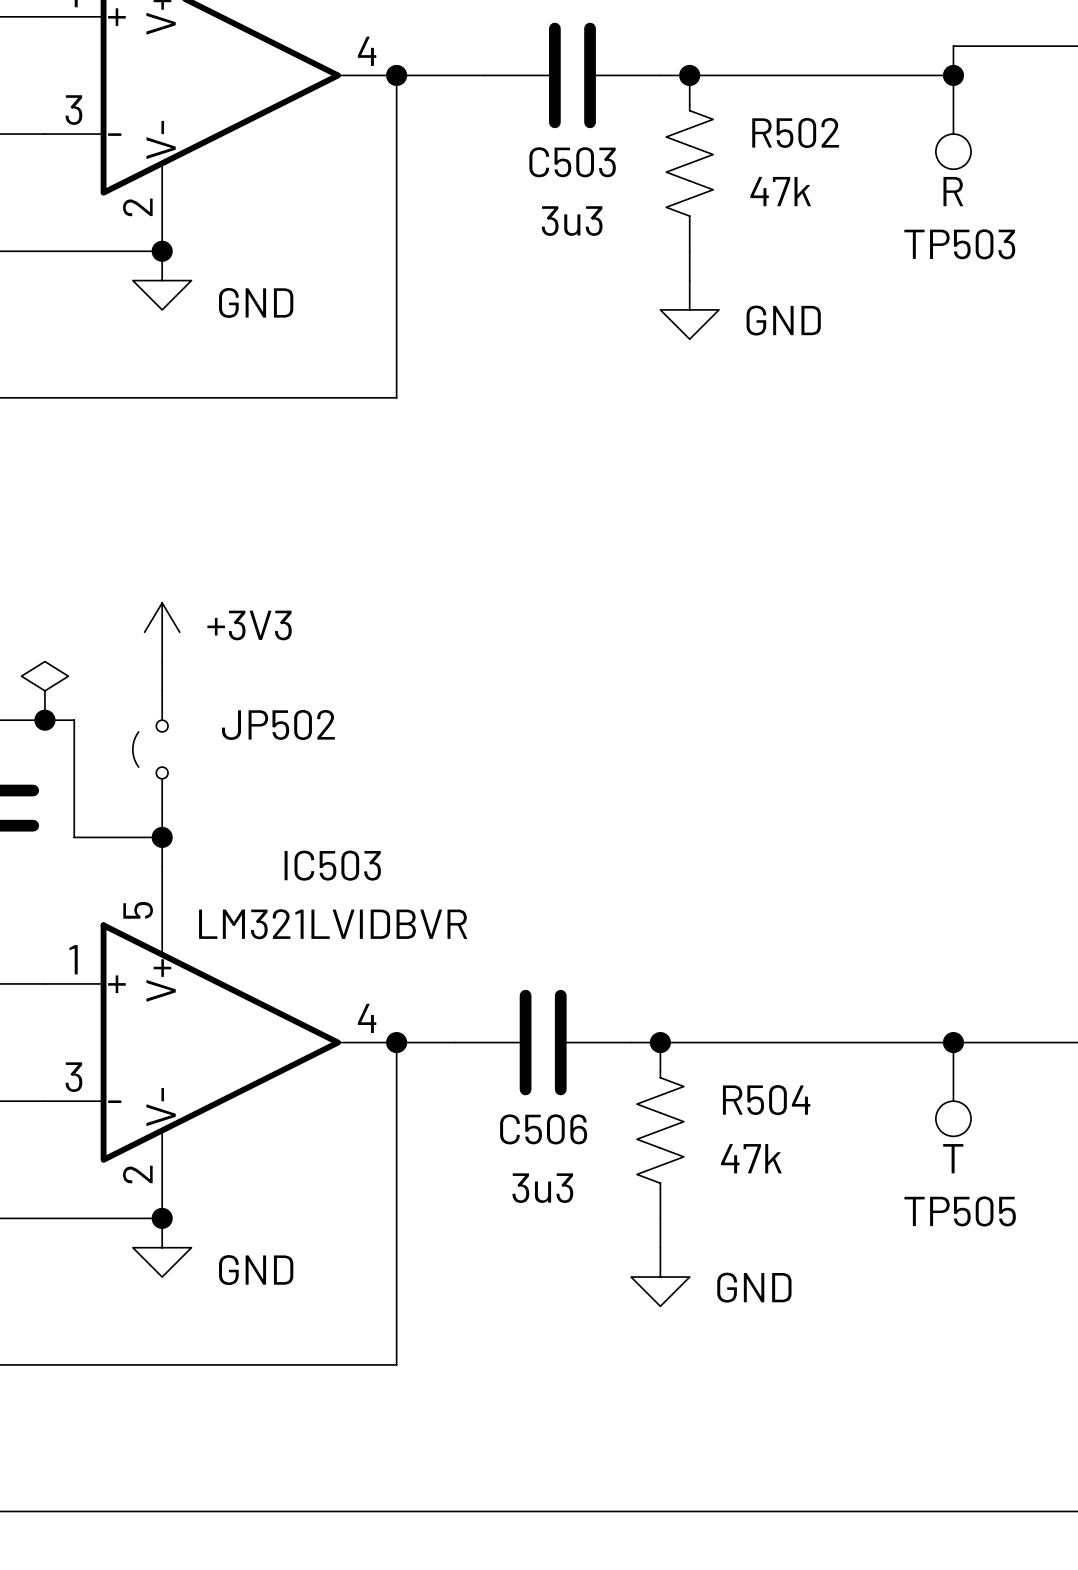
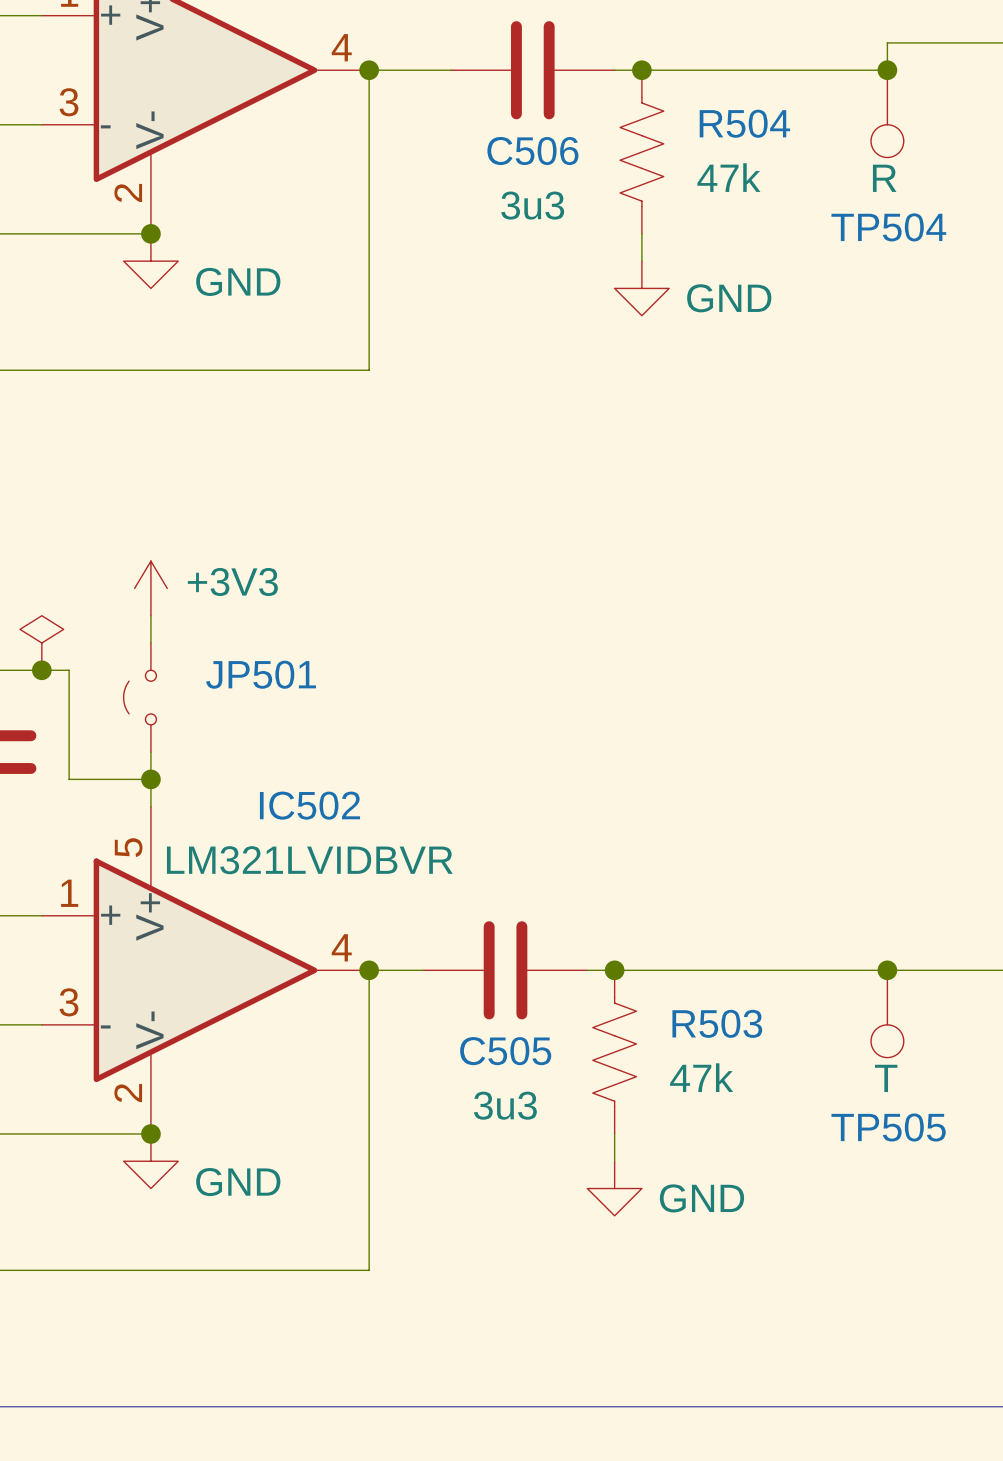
R502 name: R502 (795, 132) -> R504 (744, 123)
C503 name: C503 (572, 162) -> C506 (532, 151)
TP503 name: TP503 (959, 244) -> TP504 (888, 227)
JP502 name: JP502 (278, 724) -> JP501 (261, 674)
IC503 name: IC503 (332, 865) -> IC502 (309, 805)
R504 name: R504 (766, 1100) -> R503 (717, 1023)
C506 name: C506 (543, 1129) -> C505 (505, 1051)

